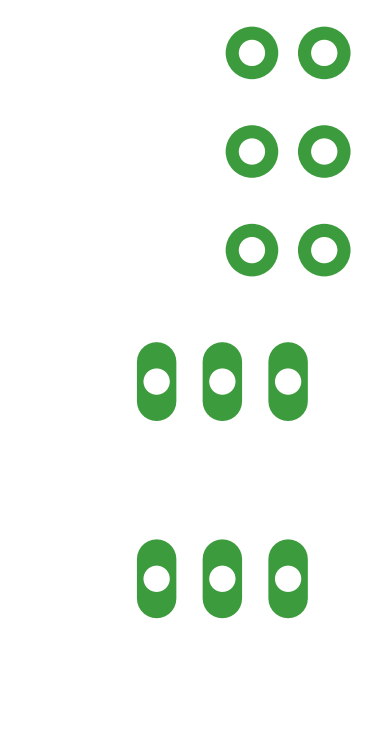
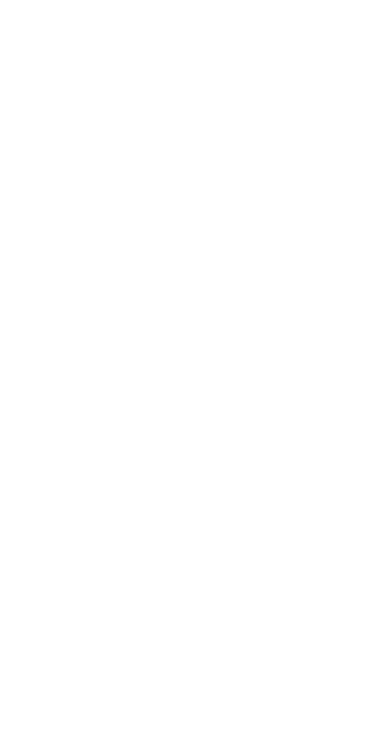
part: (288, 52) -> none
part: (288, 151) -> none
part: (288, 250) -> none
part: (222, 381) -> none
part: (222, 578) -> none

